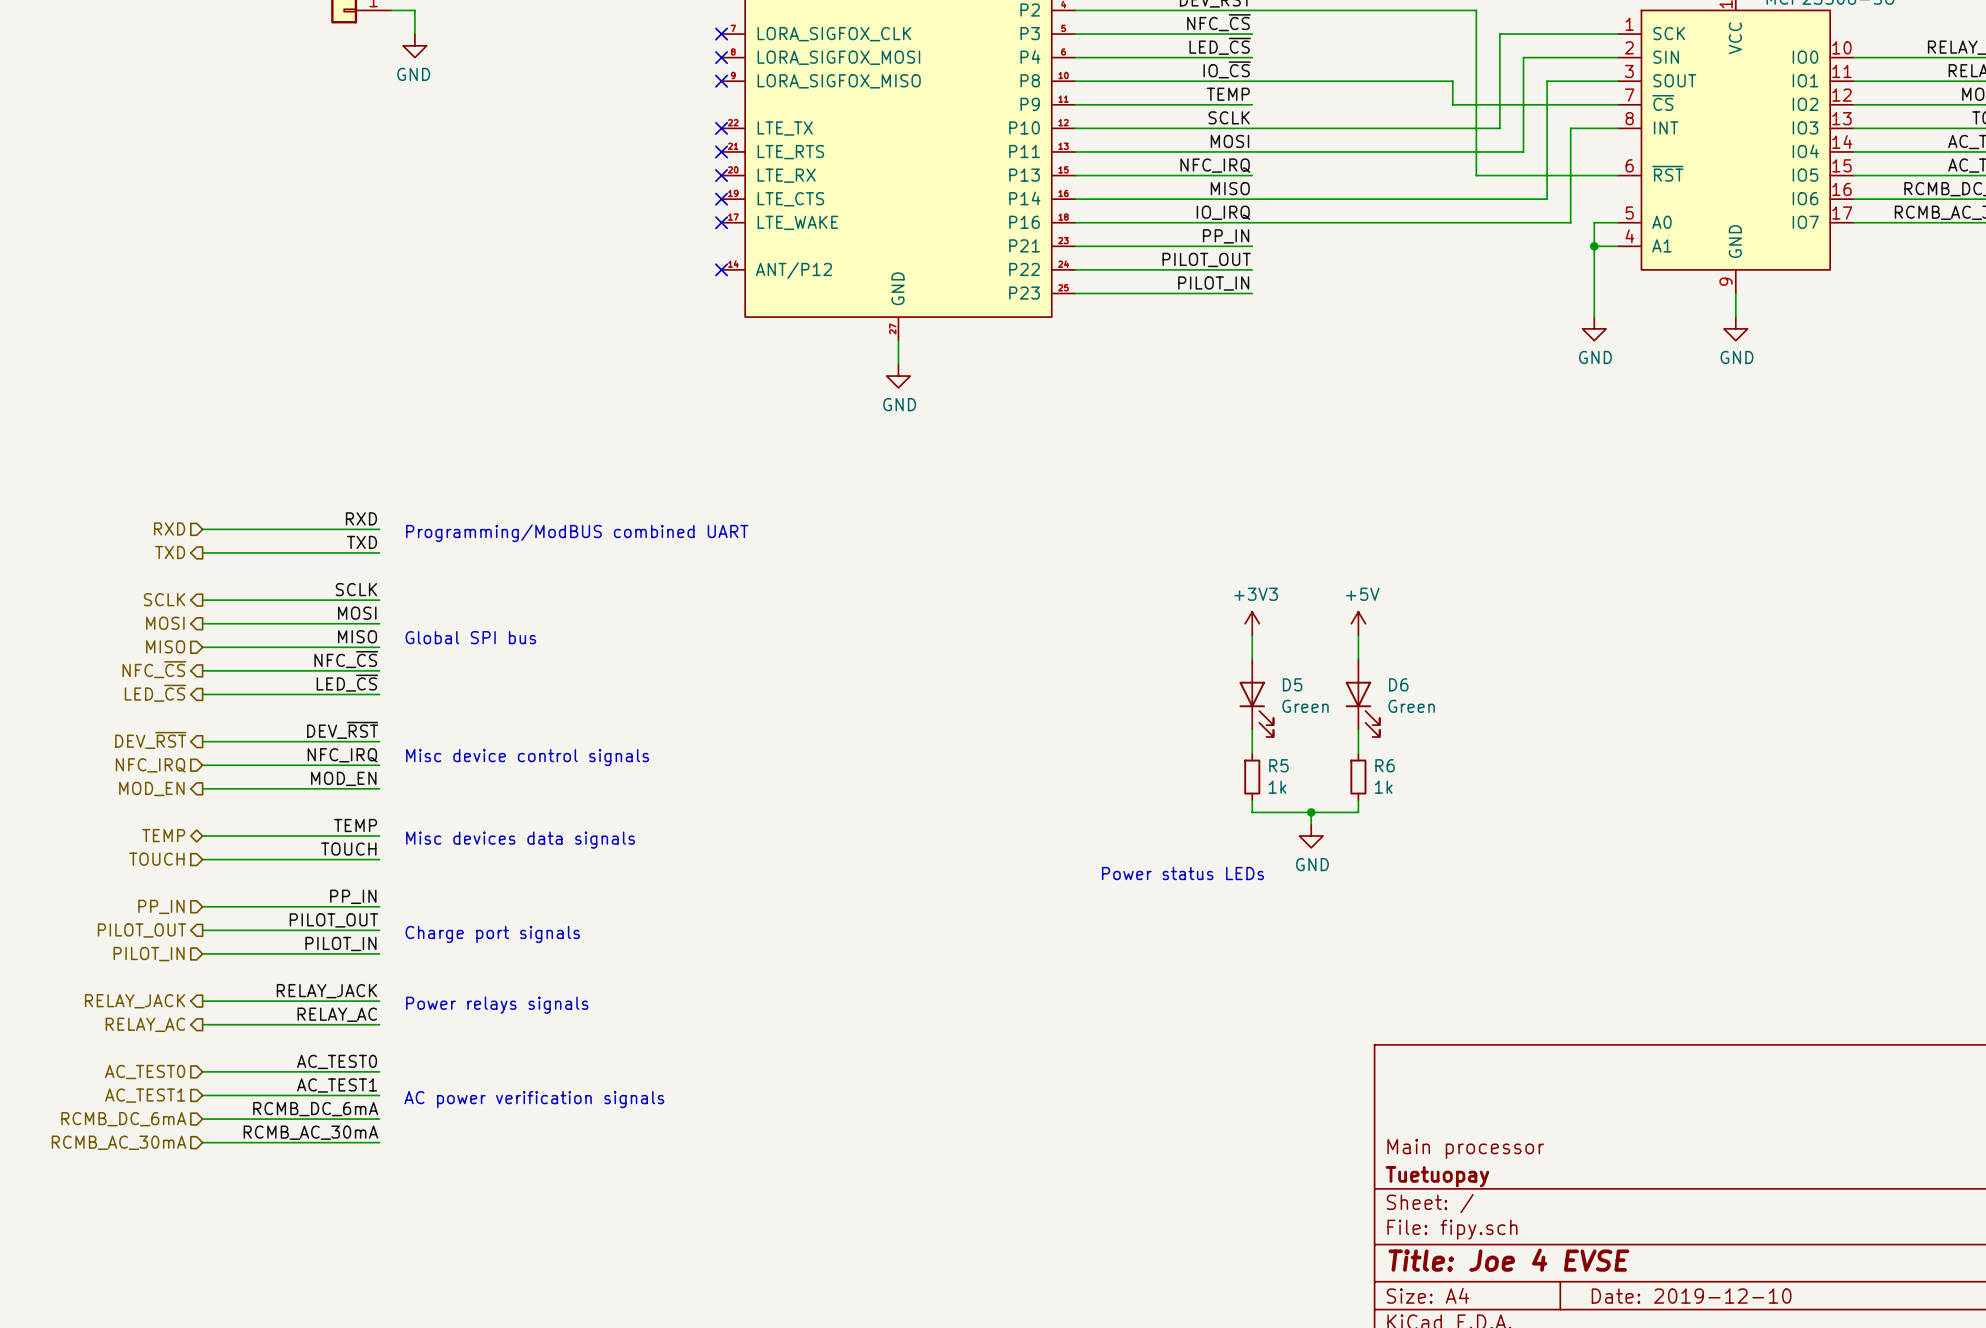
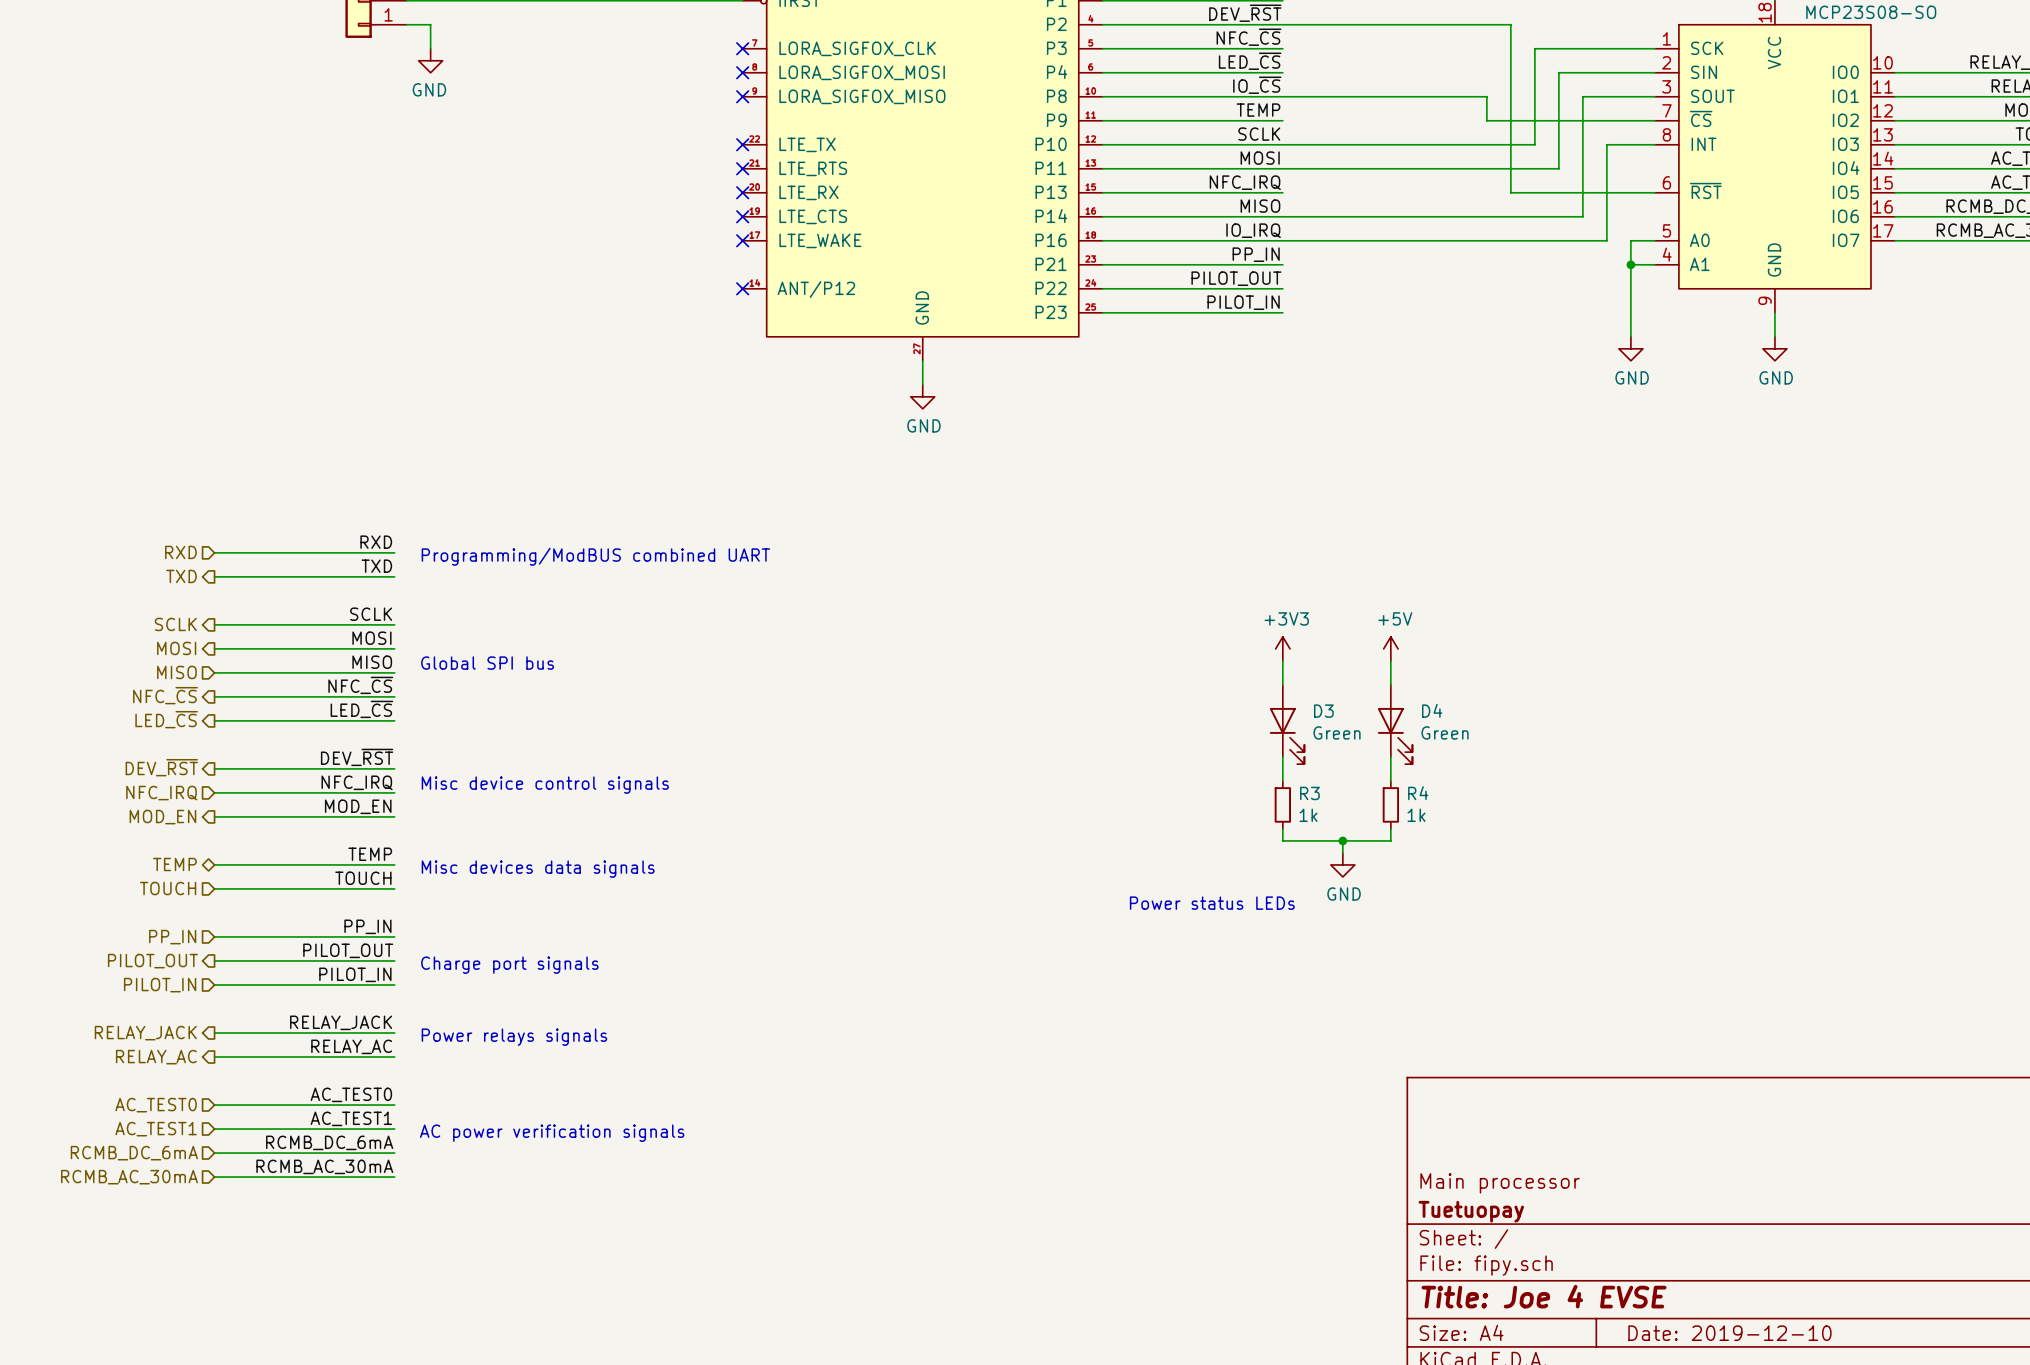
D5 name: D5 (1292, 684) -> D3 (1323, 711)
D6 name: D6 (1398, 684) -> D4 (1432, 710)
R5 name: R5 (1278, 765) -> R3 (1309, 793)
R6 name: R6 (1385, 765) -> R4 (1418, 793)

